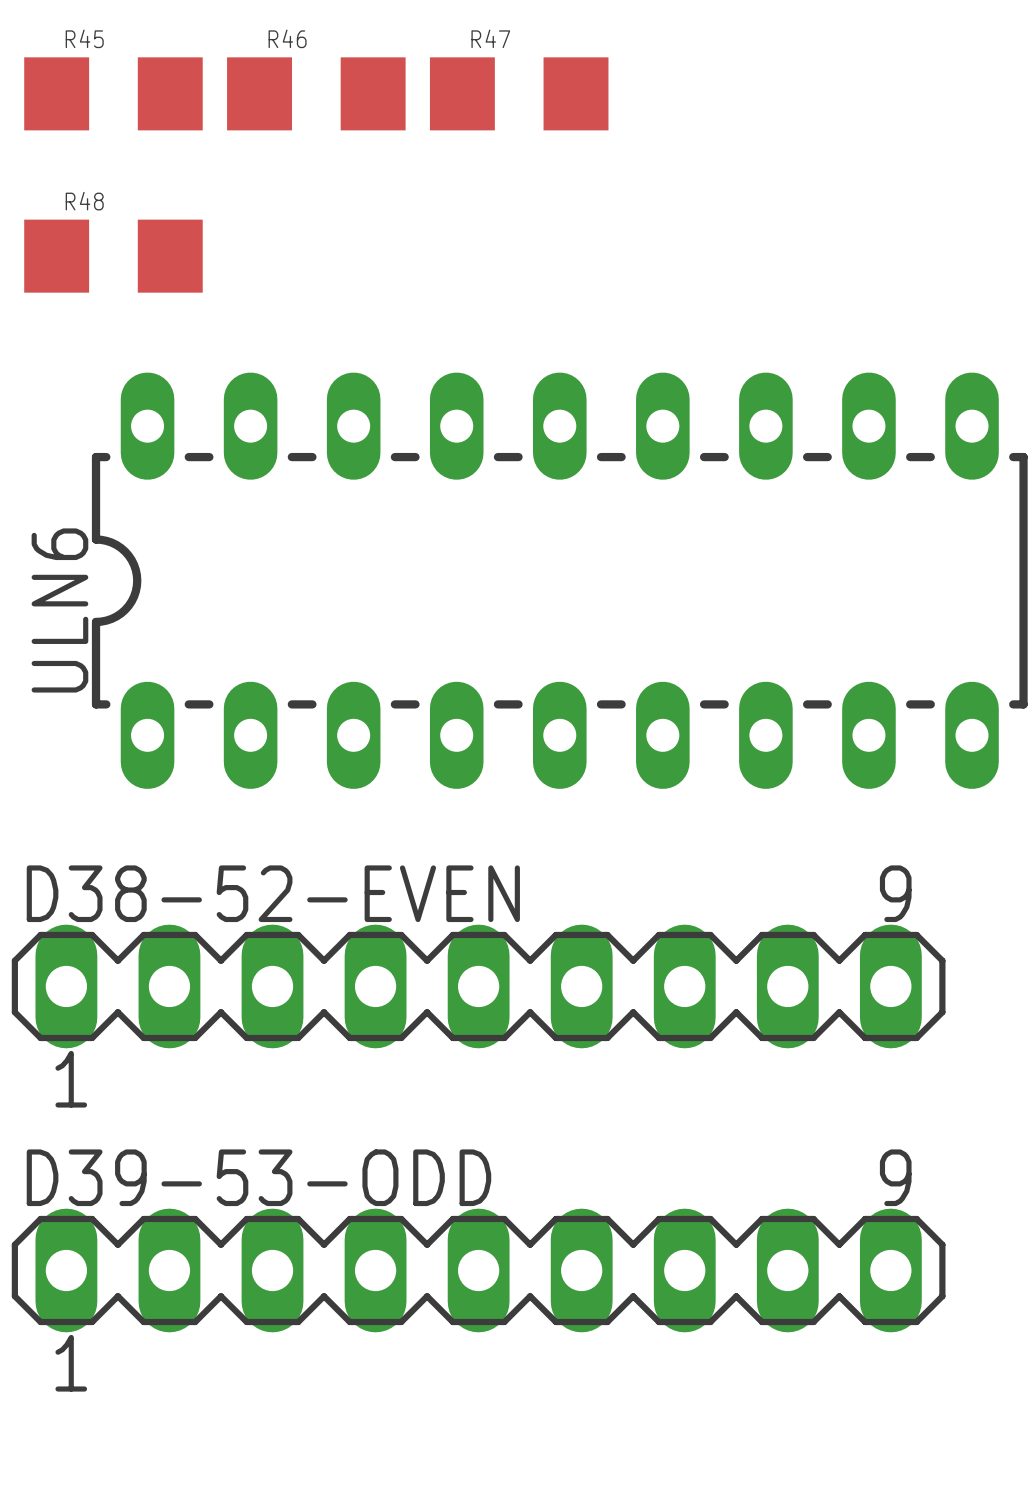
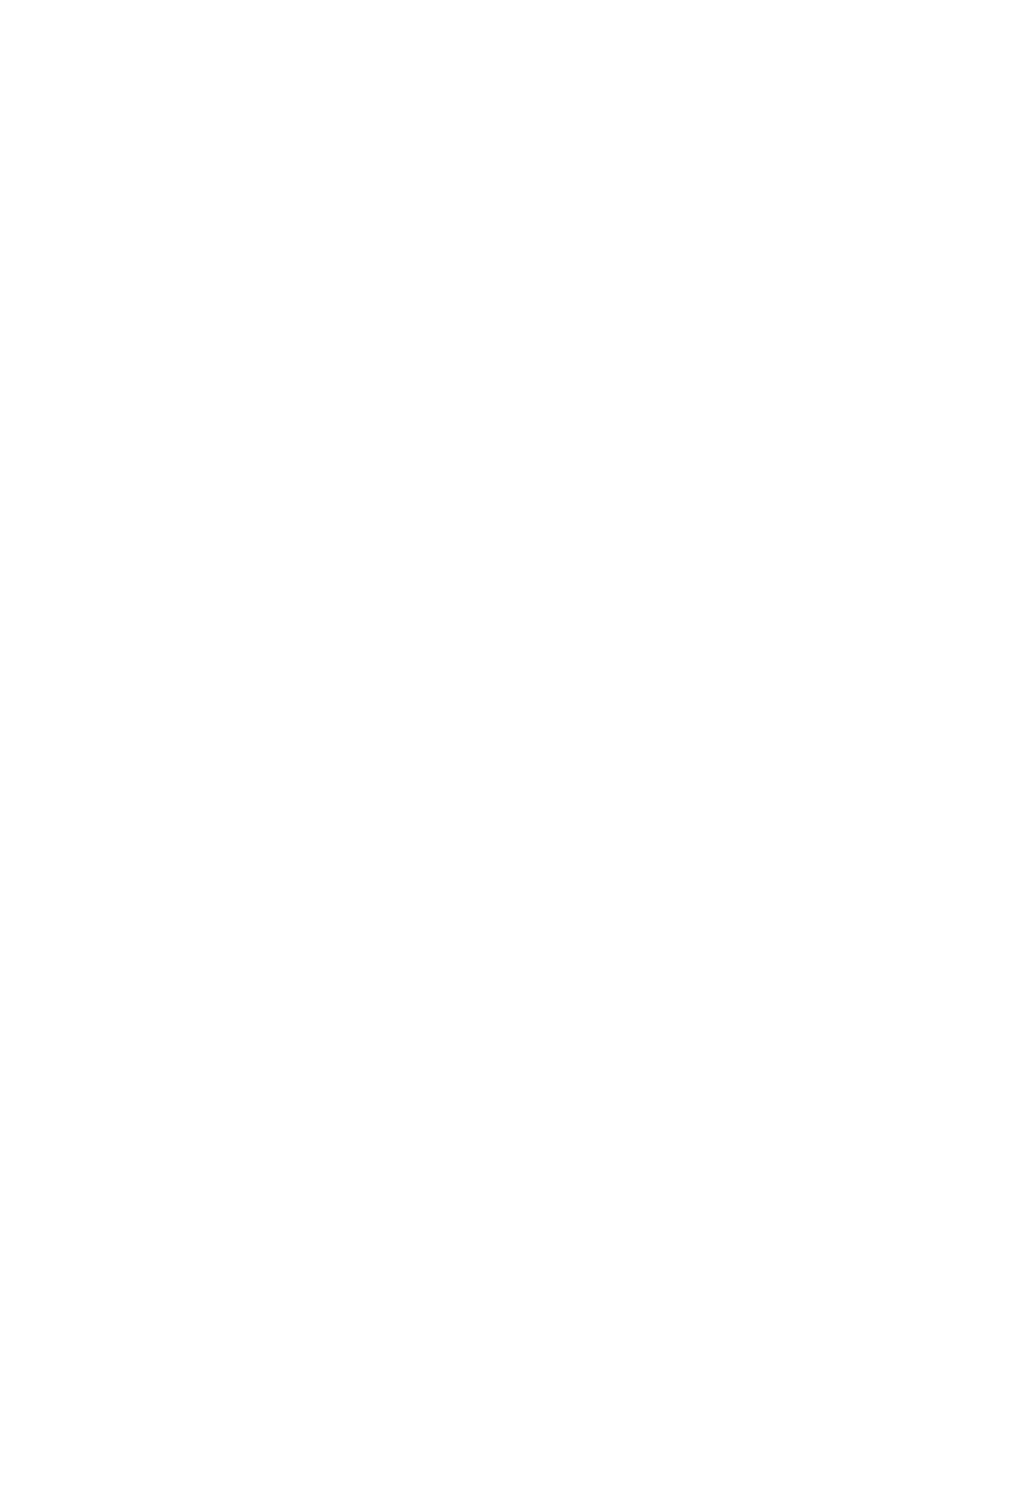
R45: (113, 93) -> none
R46: (316, 93) -> none
R47: (519, 93) -> none
R48: (113, 256) -> none
ULN6: (559, 580) -> none
D38-52-EVEN: (478, 986) -> none
D39-53-ODD: (478, 1270) -> none

